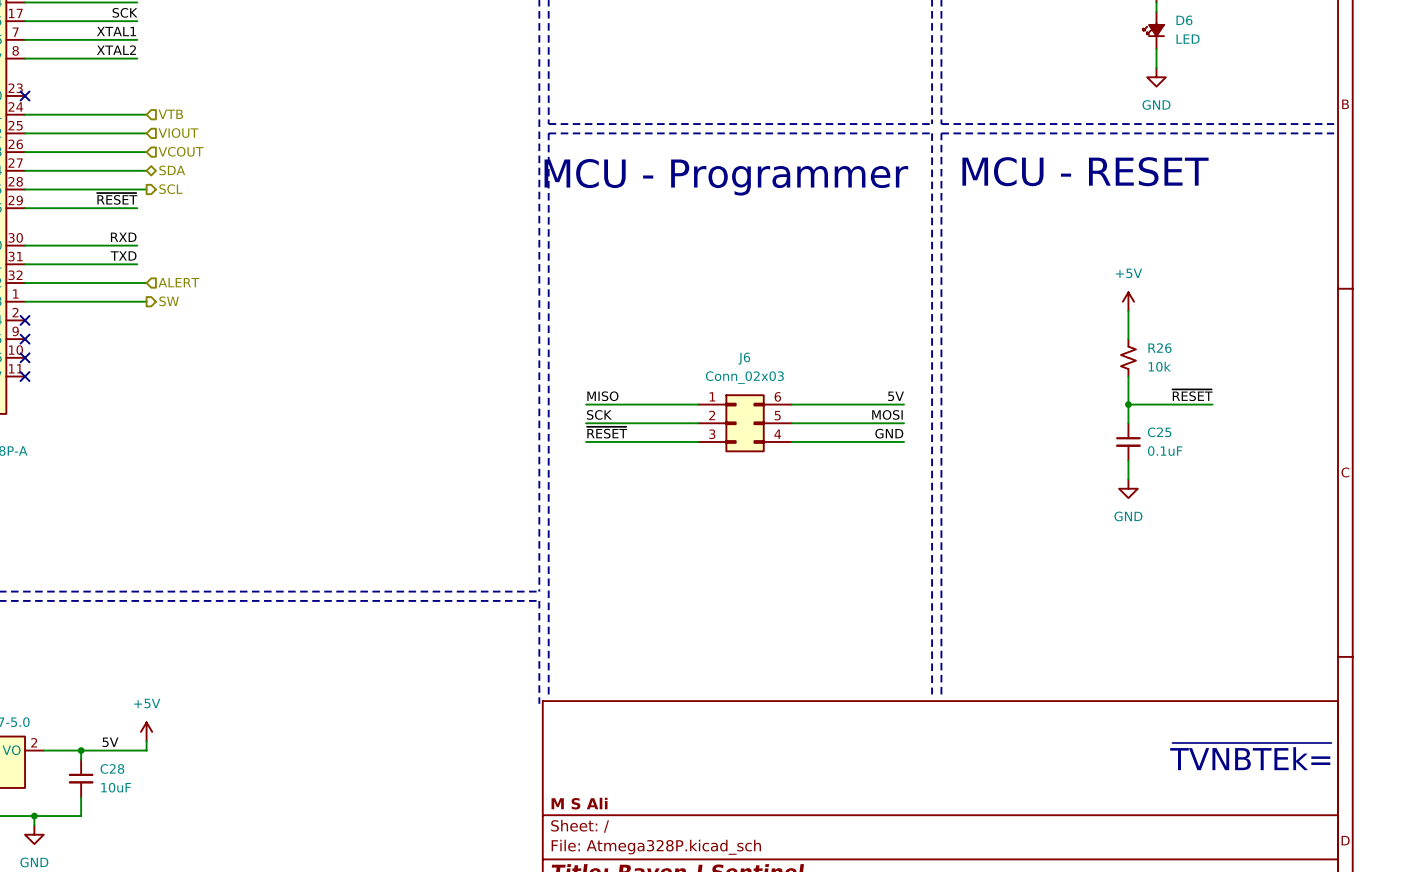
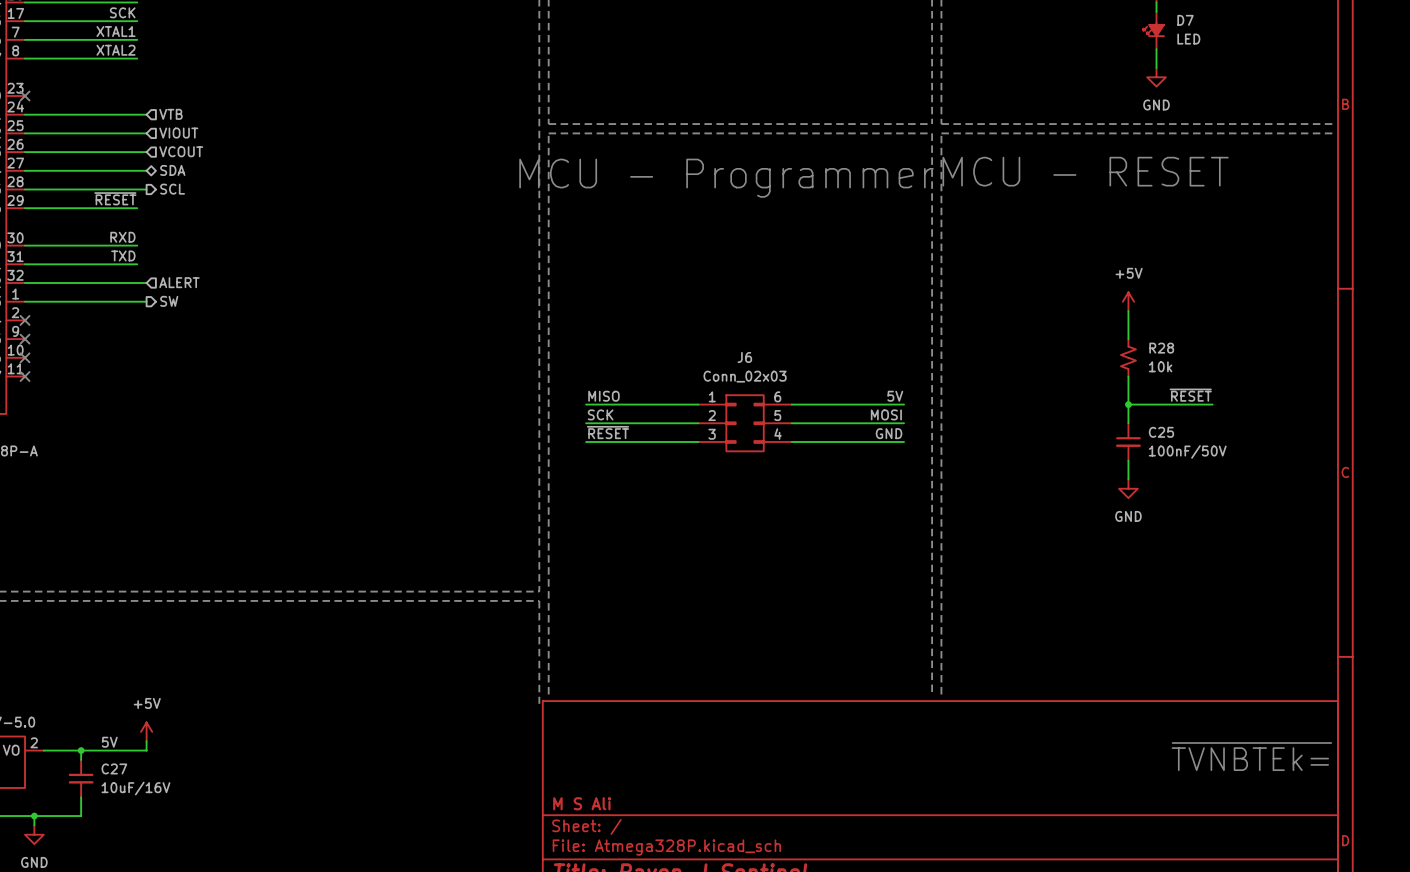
D6 name: D6 (1184, 20) -> D7 (1185, 20)
R26 name: R26 (1159, 348) -> R28 (1161, 348)
C25 value: 0.1uF (1165, 451) -> 100nF/50V (1187, 451)
C28 name: C28 (112, 768) -> C27 (114, 768)
C28 value: 10uF (116, 787) -> 10uF/16V (135, 788)

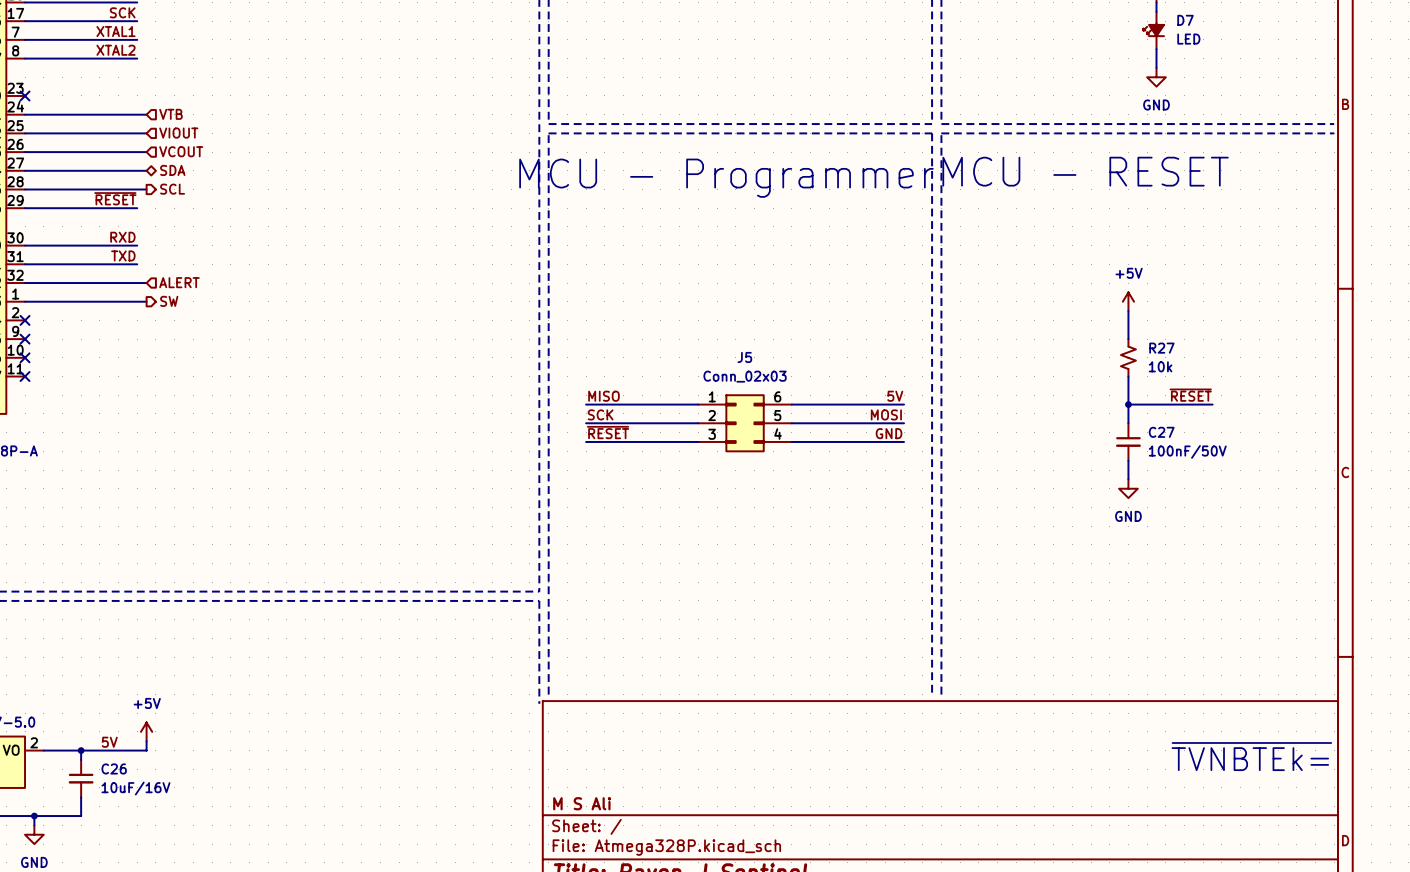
R28 name: R28 (1161, 348) -> R27 (1161, 348)
J6 name: J6 (744, 357) -> J5 (744, 357)
C25 name: C25 (1161, 432) -> C27 (1161, 432)
C27 name: C27 (114, 768) -> C26 (114, 768)

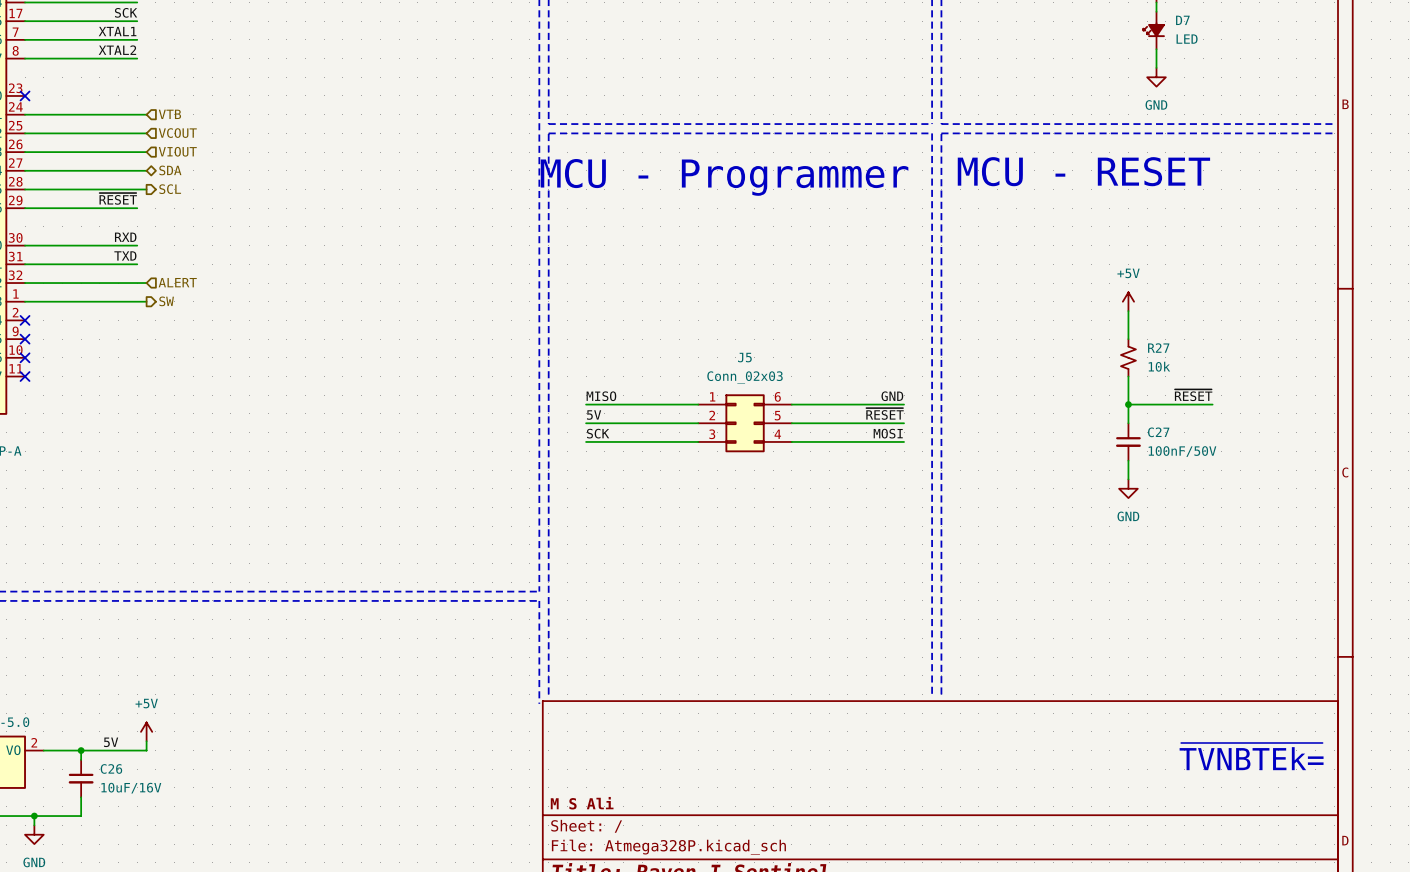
hierarchical label: VIOUT (178, 133) -> VCOUT (177, 133)
hierarchical label: VCOUT (181, 151) -> VIOUT (177, 151)
label: 5V (895, 396) -> GND (892, 396)
label: SCK (600, 414) -> 5V (594, 415)
label: MOSI (886, 414) -> ~{RESET} (885, 413)
label: ~{RESET} (608, 432) -> SCK (598, 433)
label: GND (889, 433) -> MOSI (888, 433)

